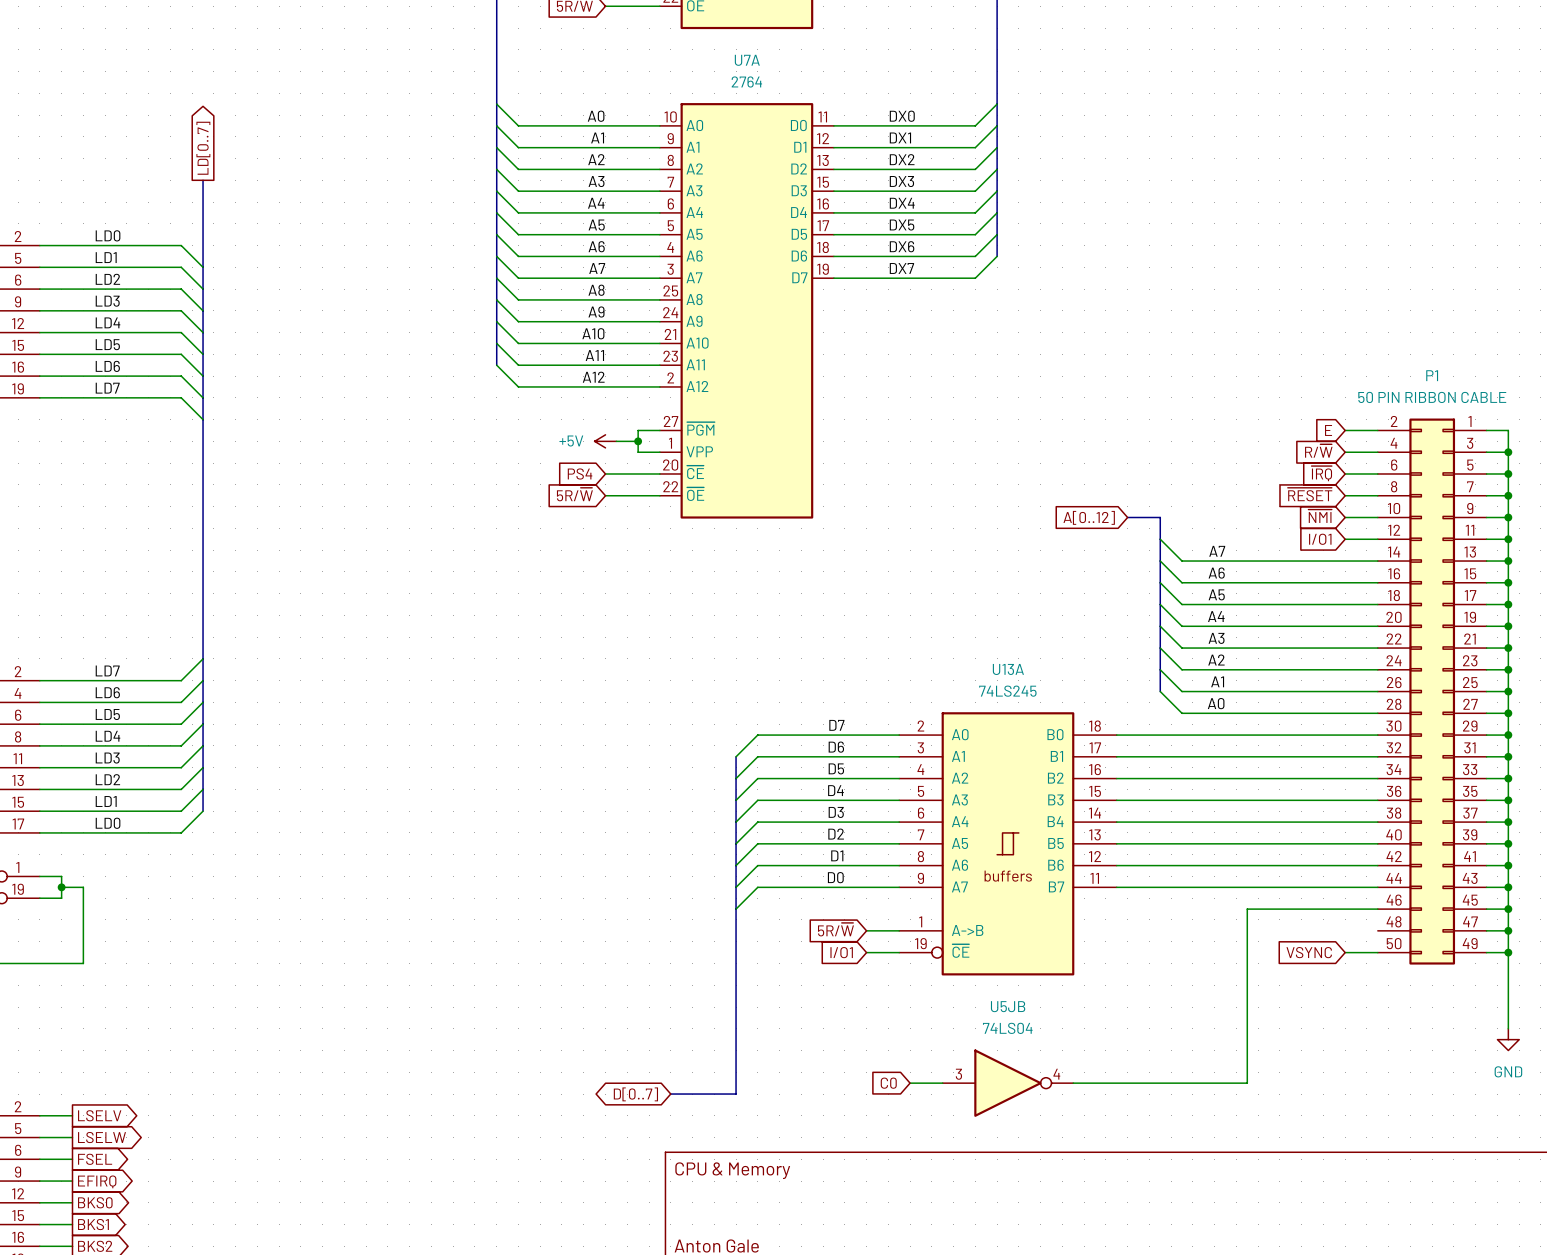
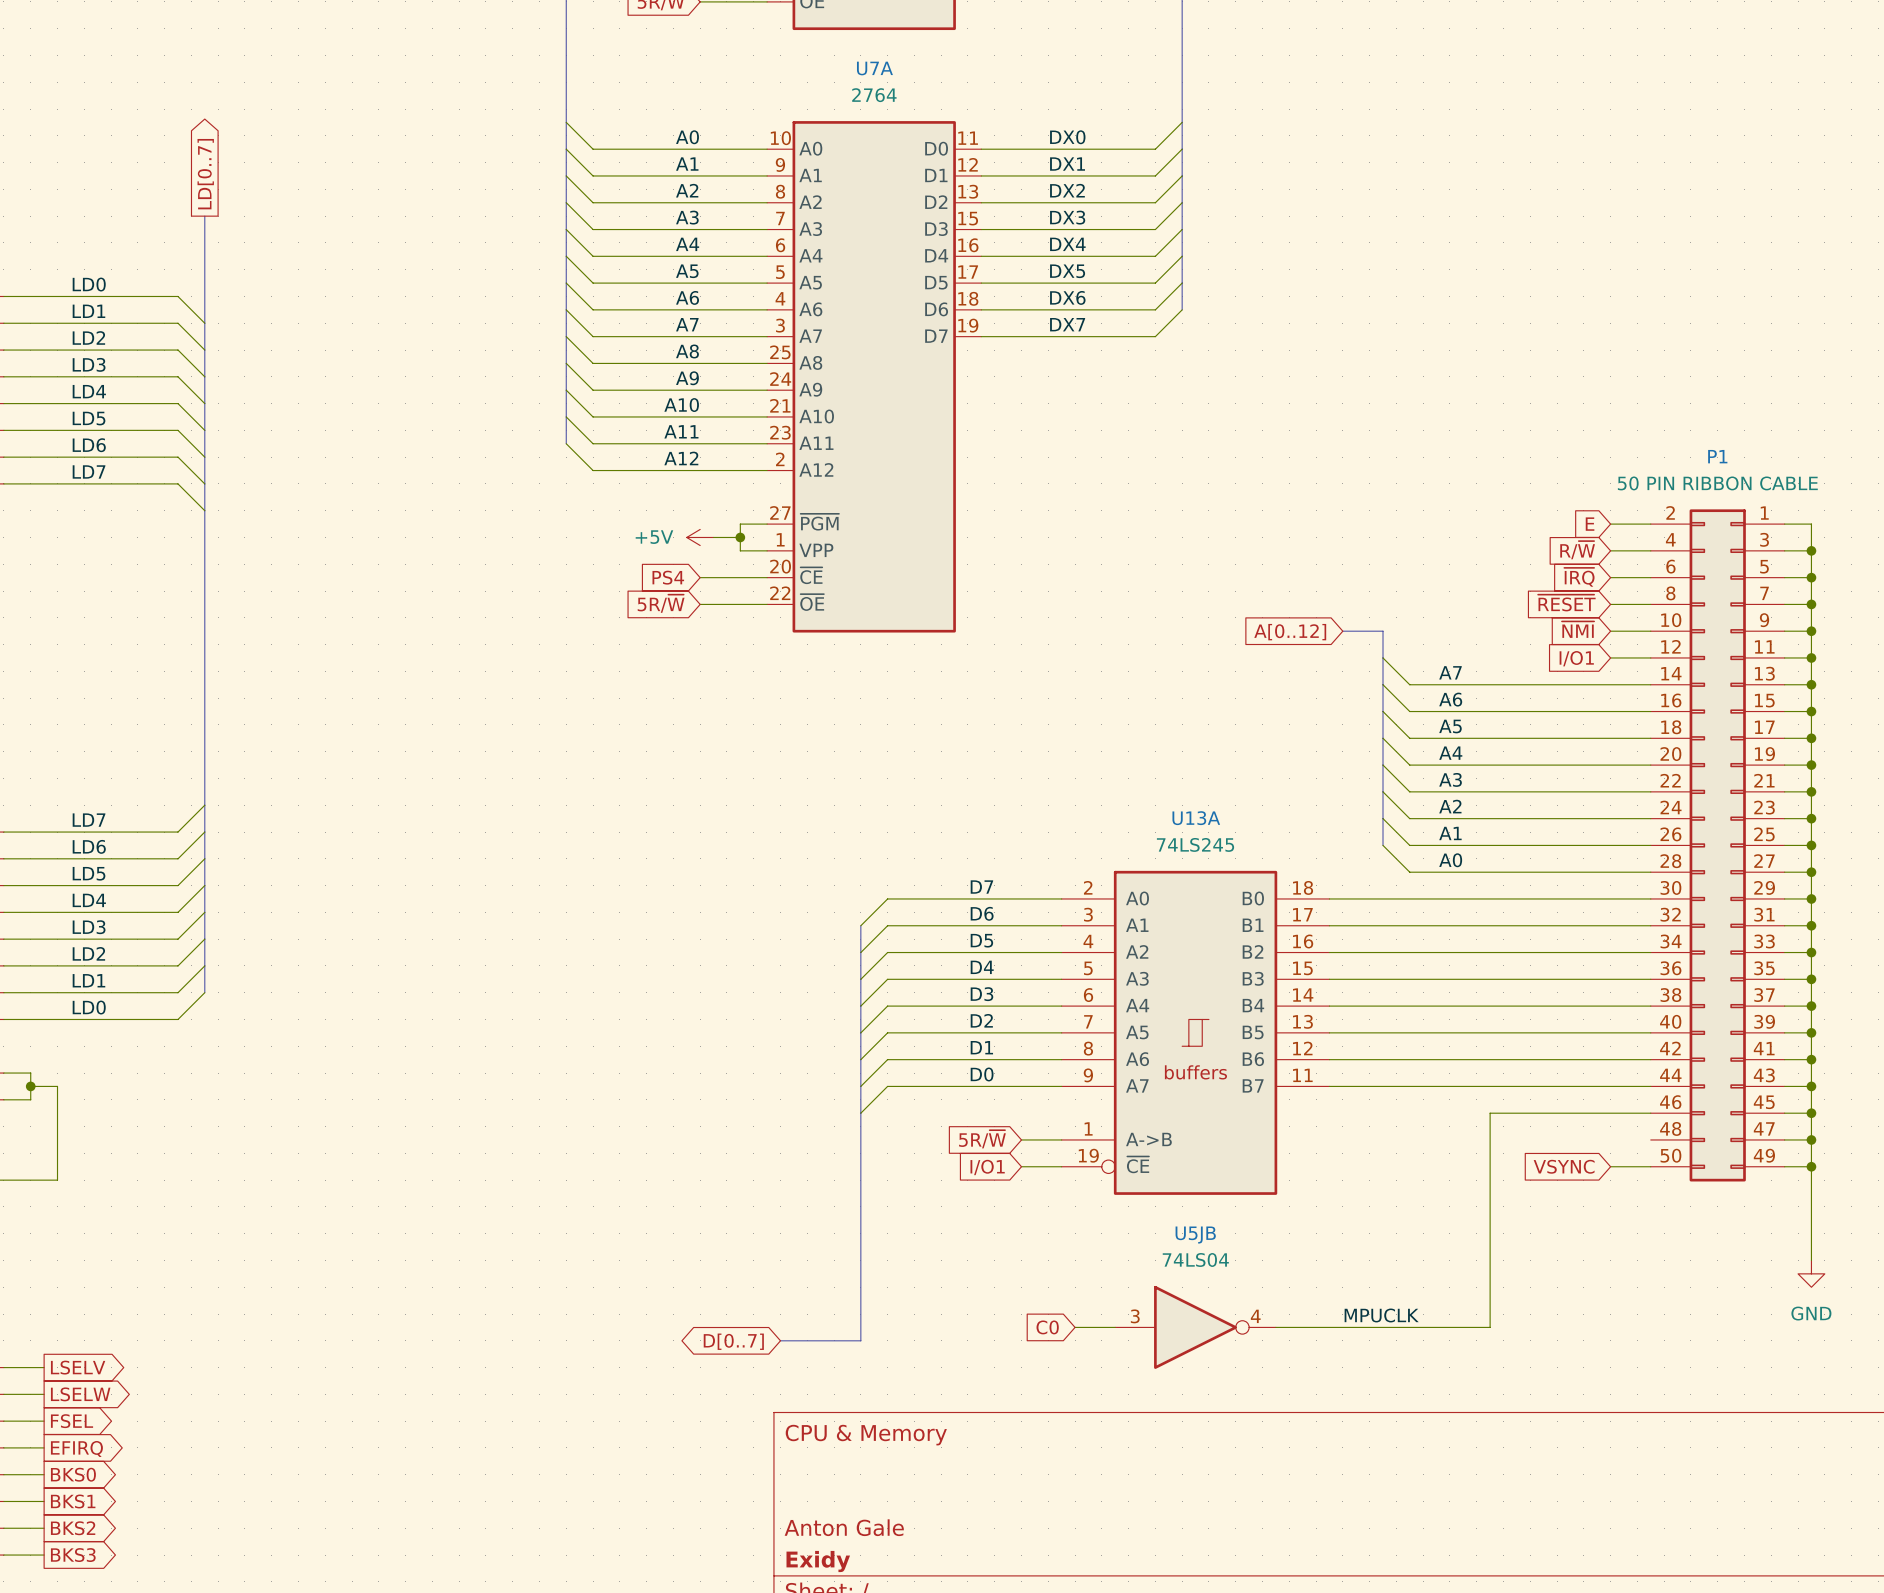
label: none -> MPUCLK (1381, 1315)

